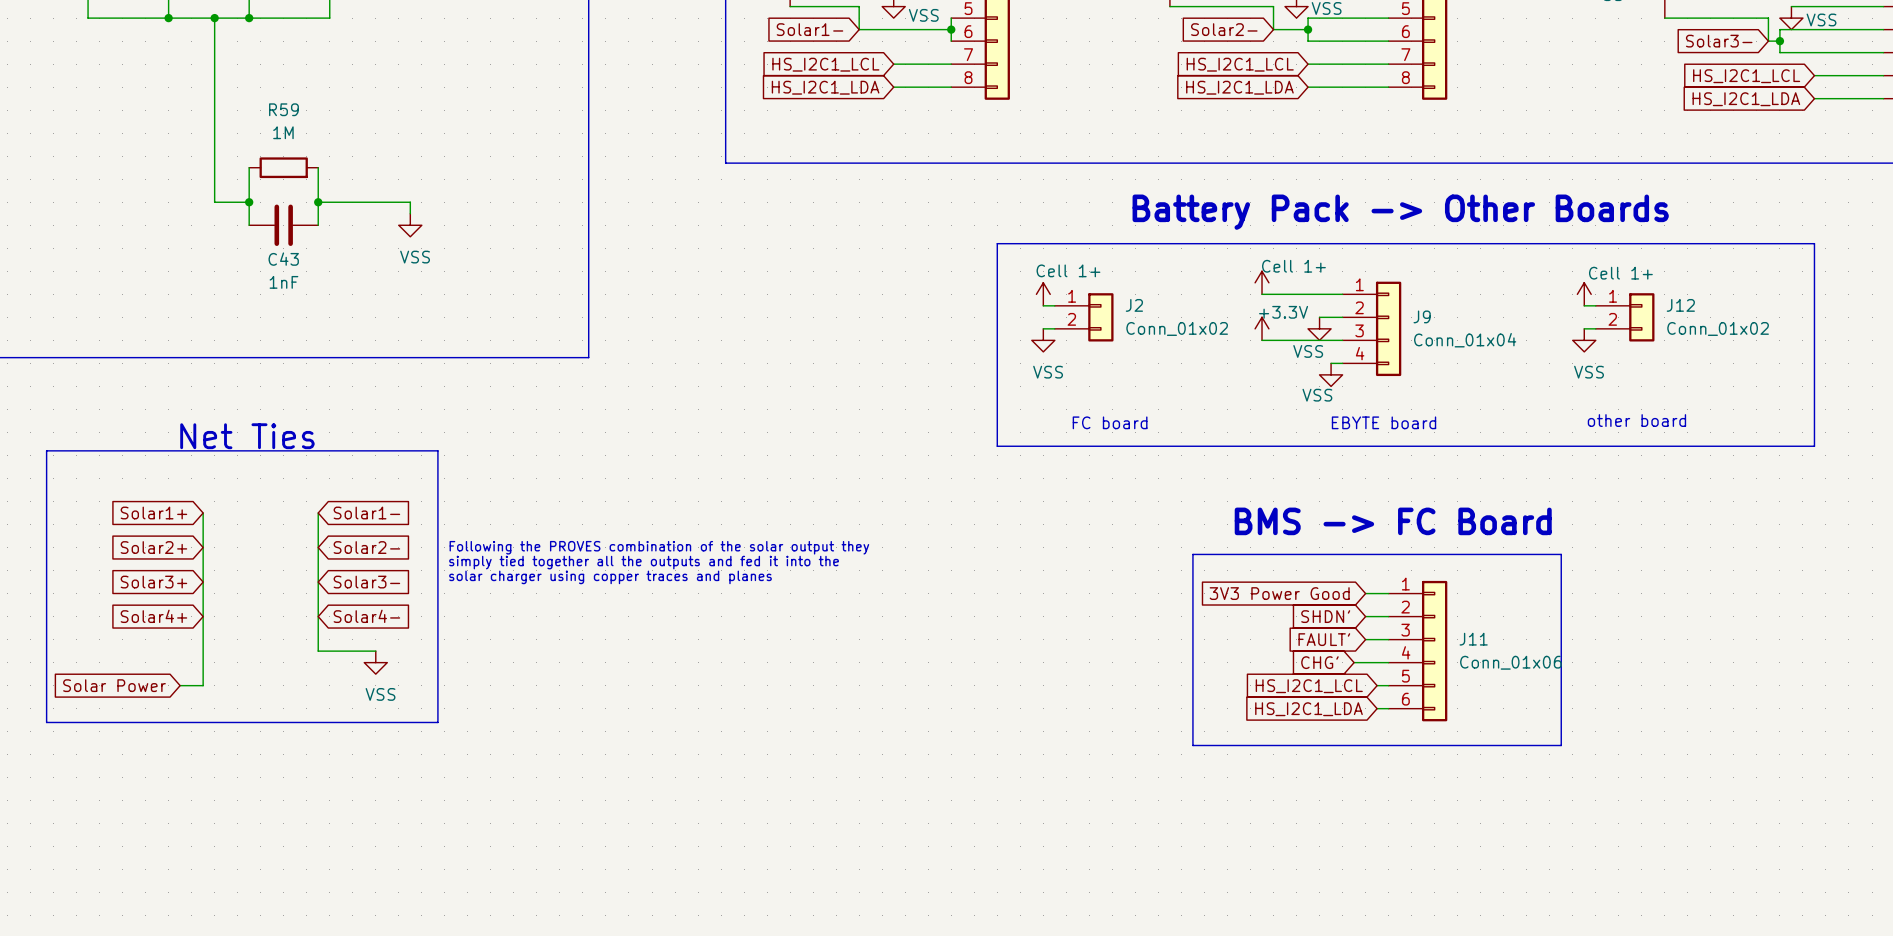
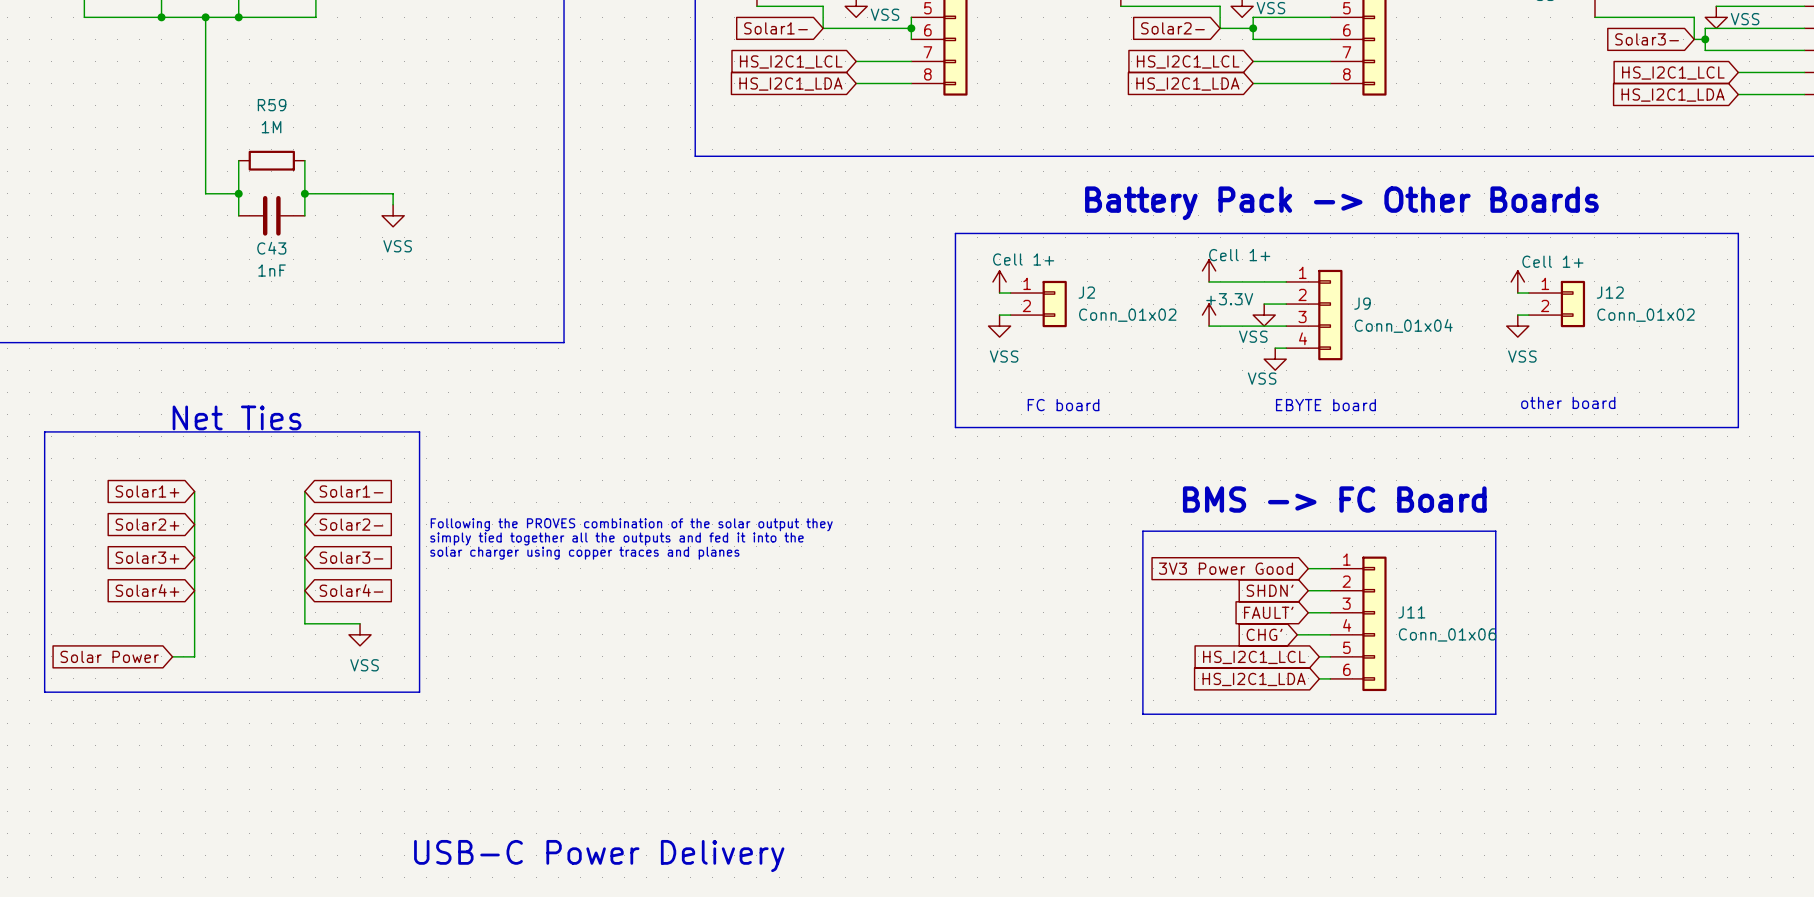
text: none -> USB-C Power Delivery (599, 856)

